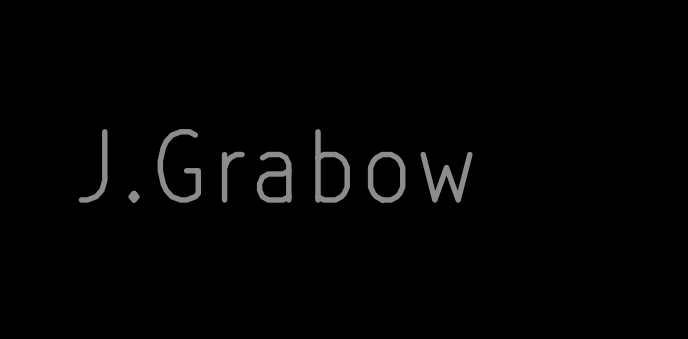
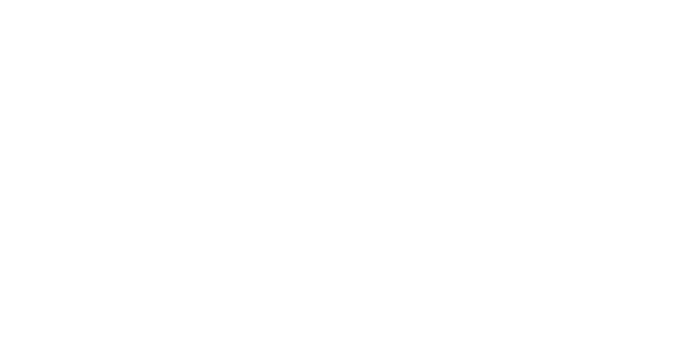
text: J.Grabow (275, 165) -> none

